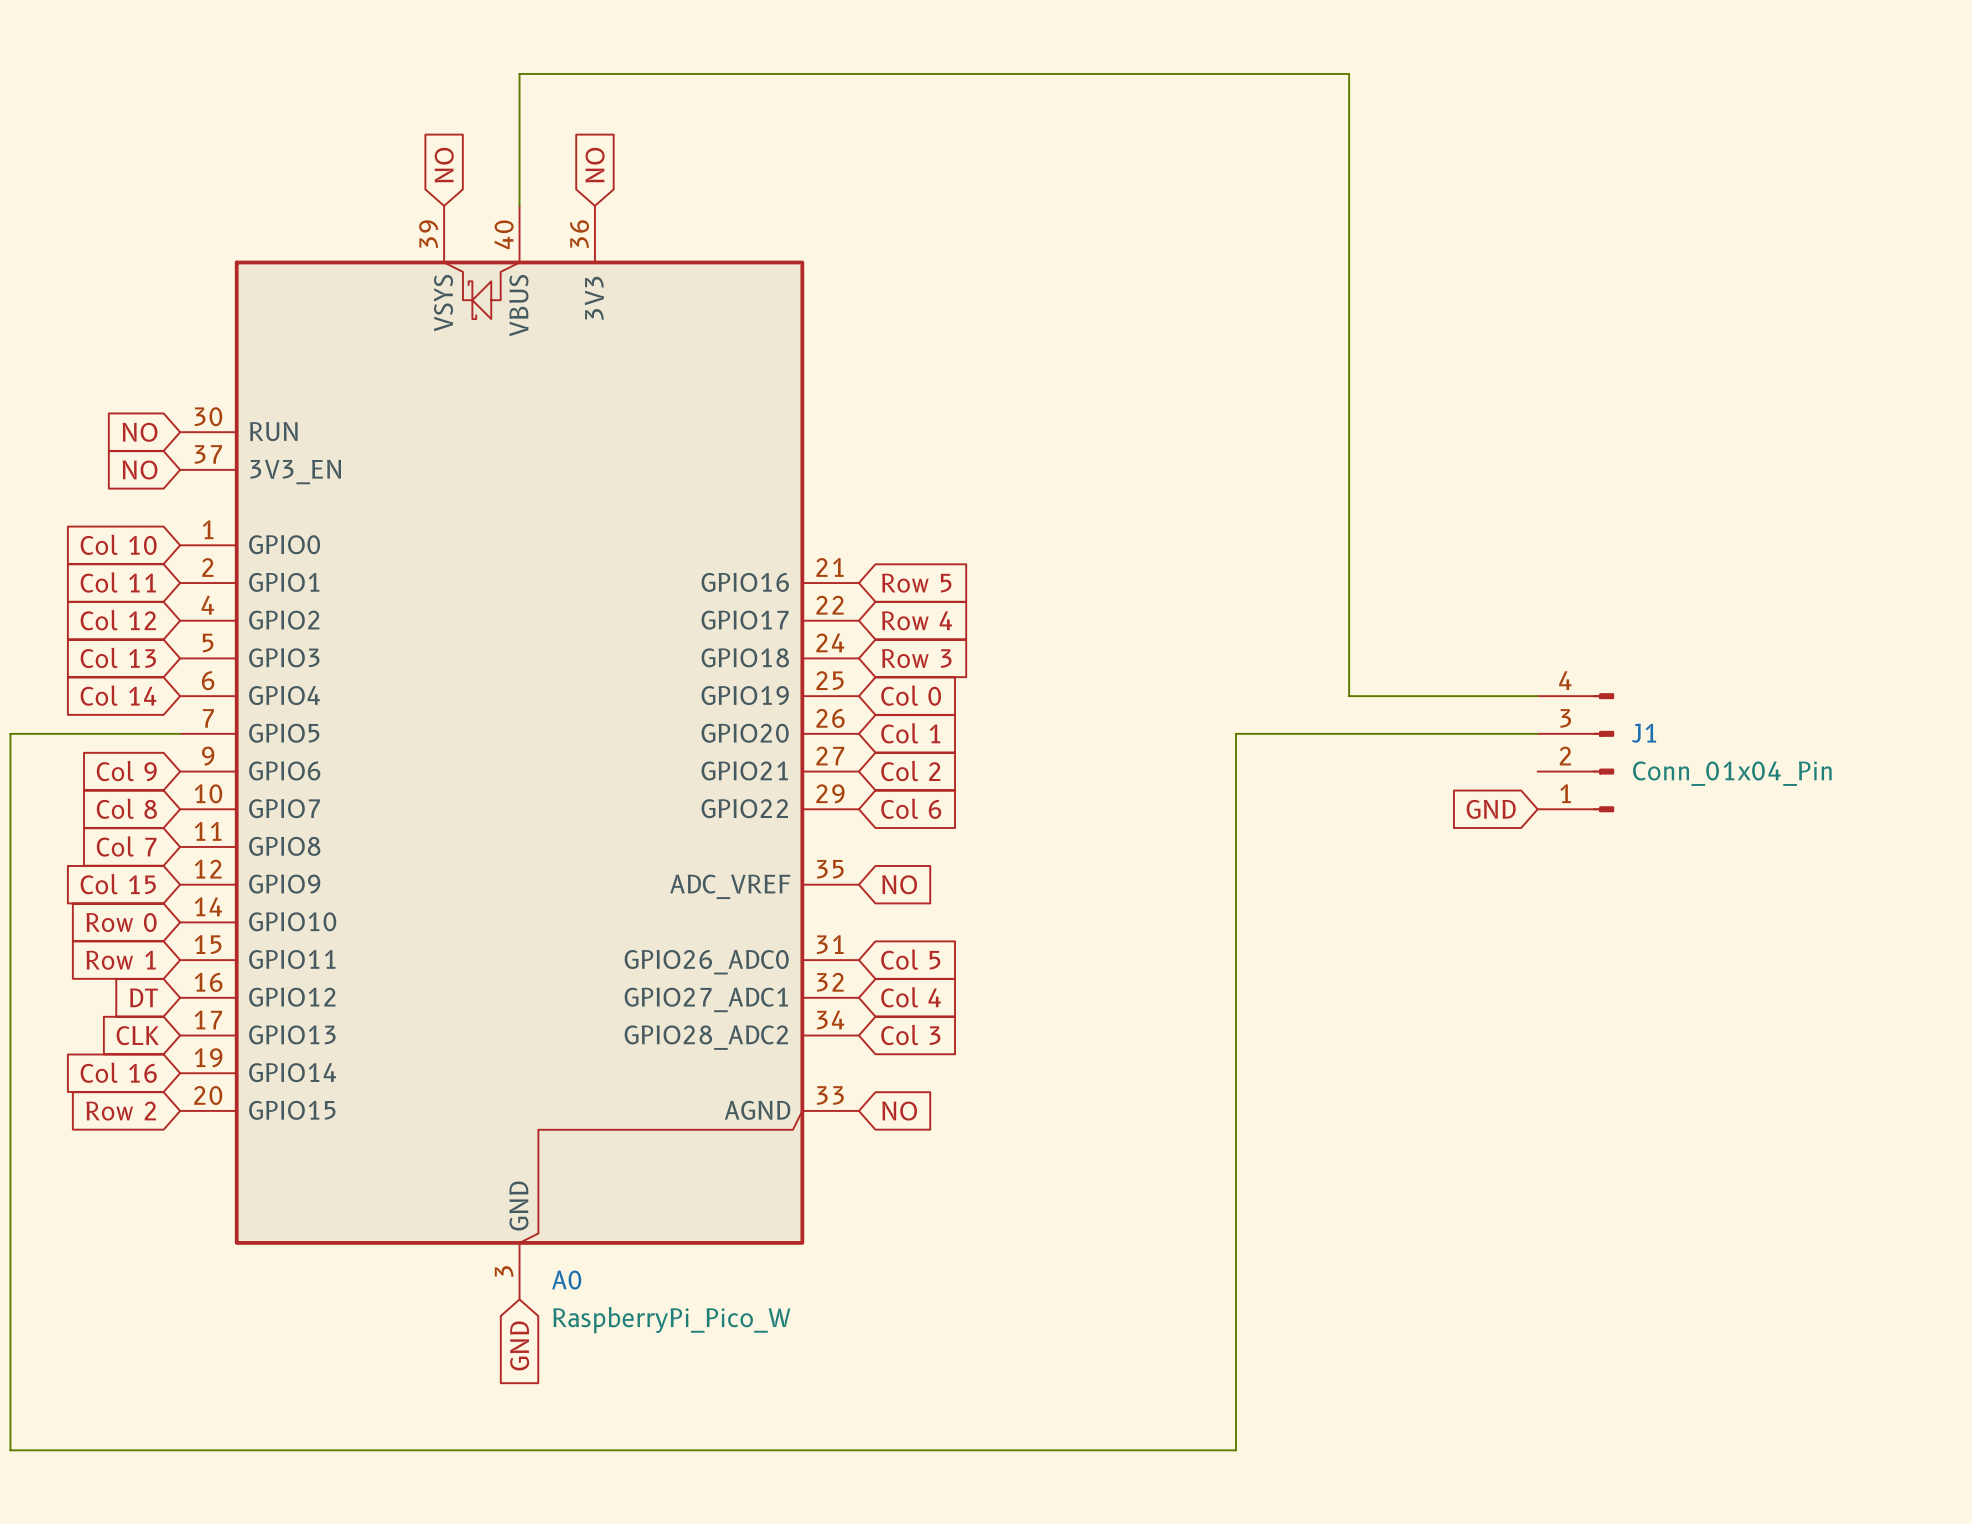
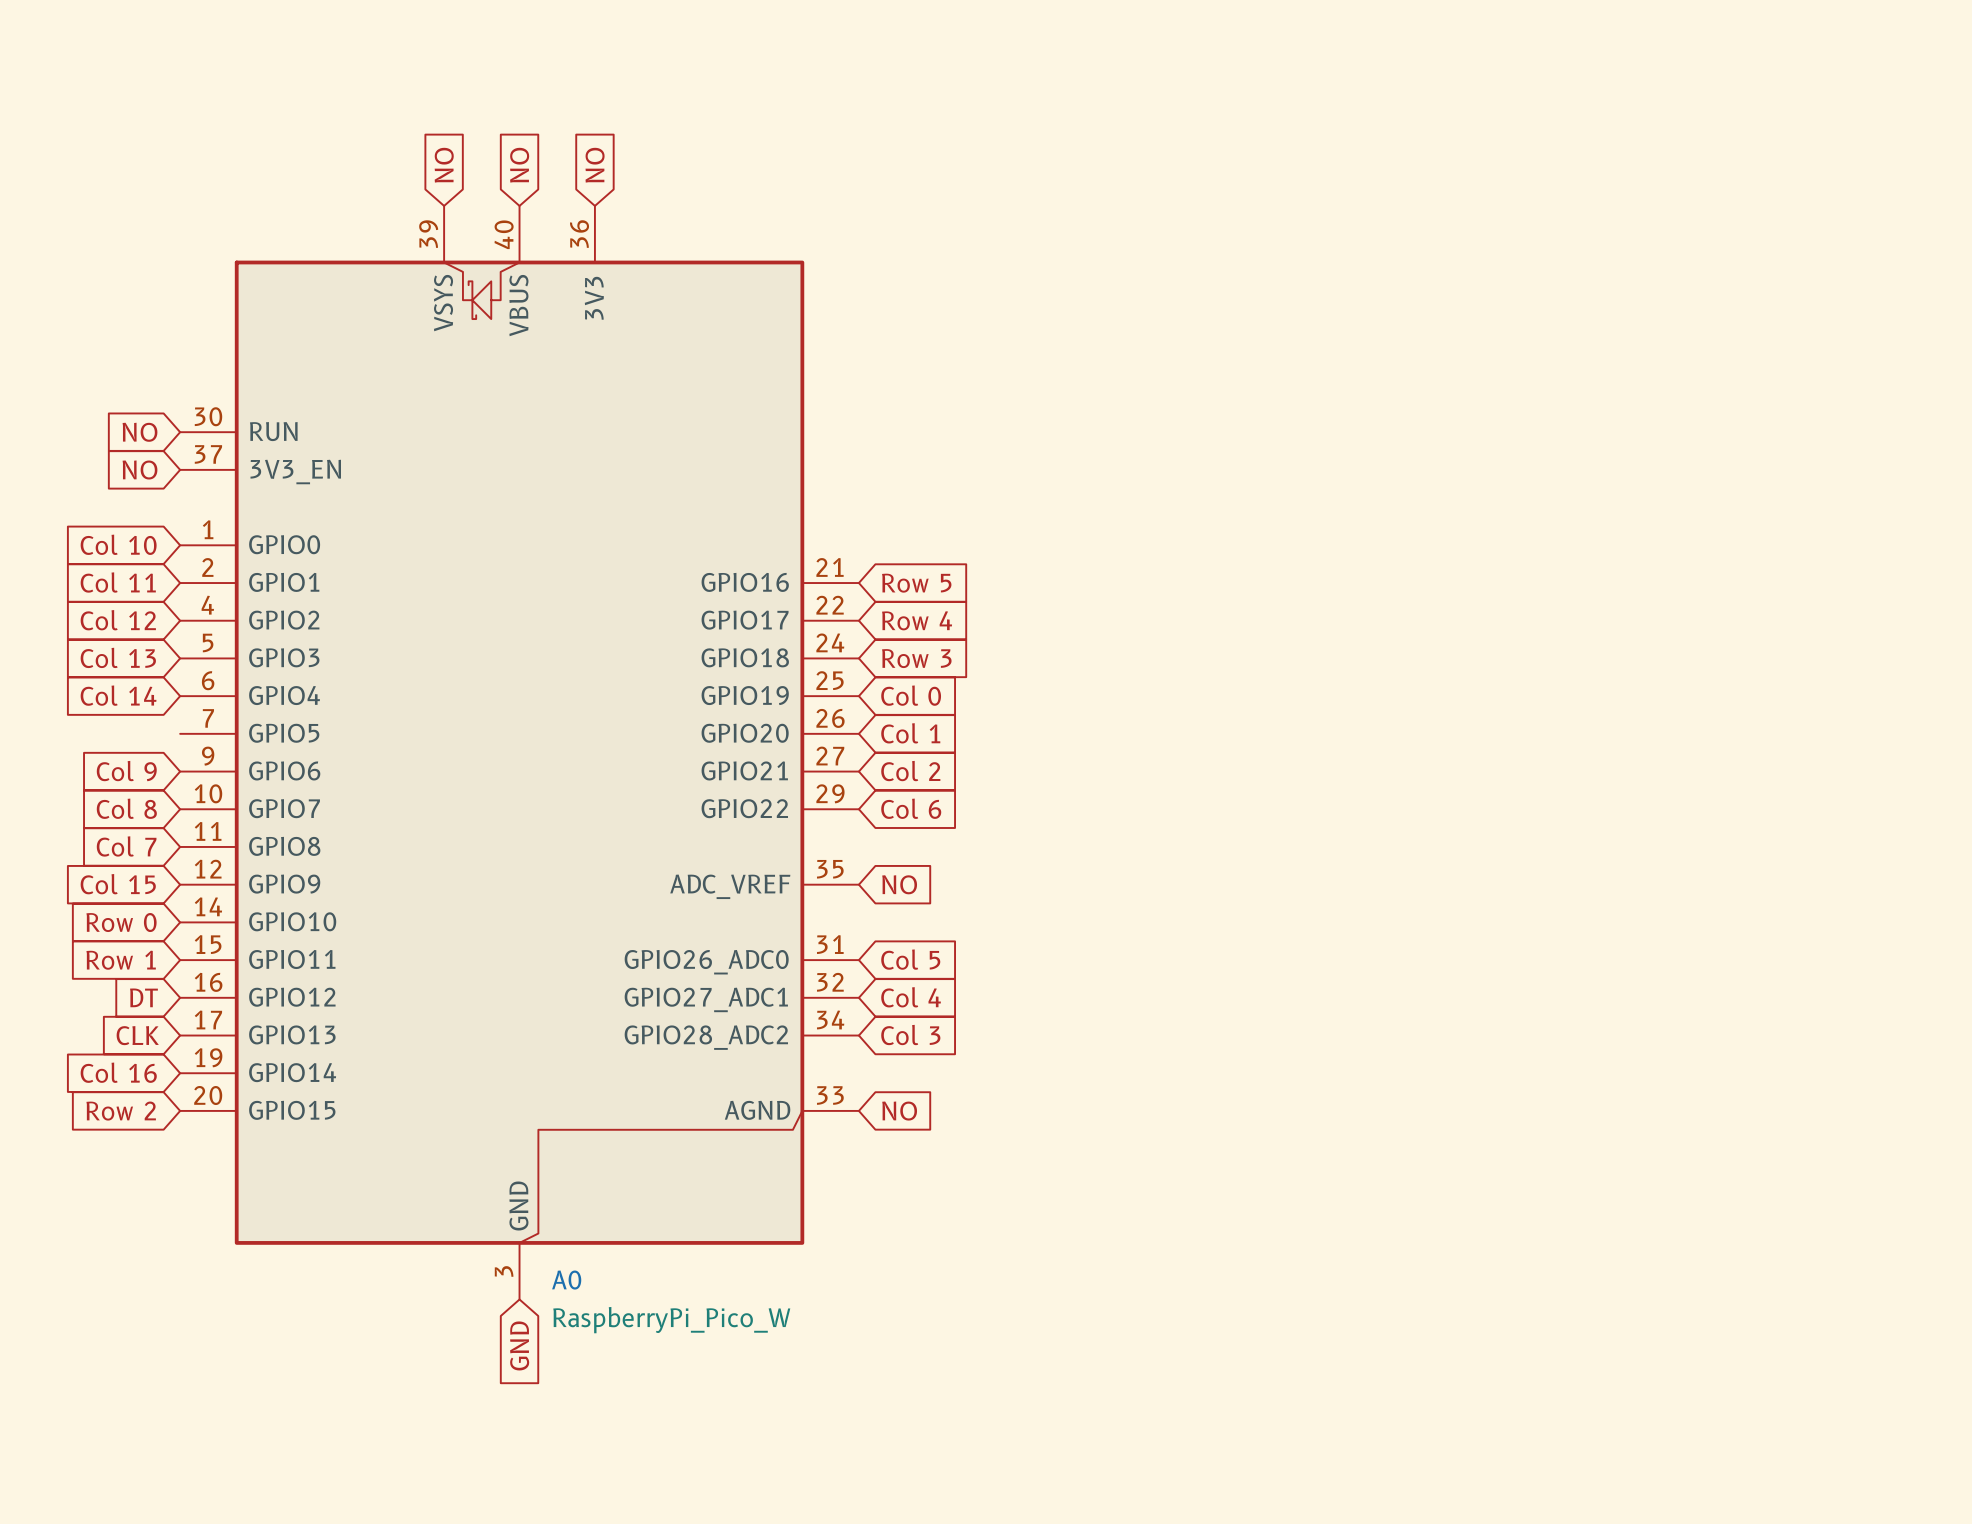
global label: none -> NO (519, 165)
wire: (519, 205) (519, 73) (1349, 73) (1349, 696) (1537, 696) -> none
wire: (180, 733) (10, 733) (10, 1450) (1235, 1450) (1235, 733) (1537, 733) -> none
J1: Conn_01x04_Pin (1575, 752) -> none
global label: GND (1491, 809) -> none

